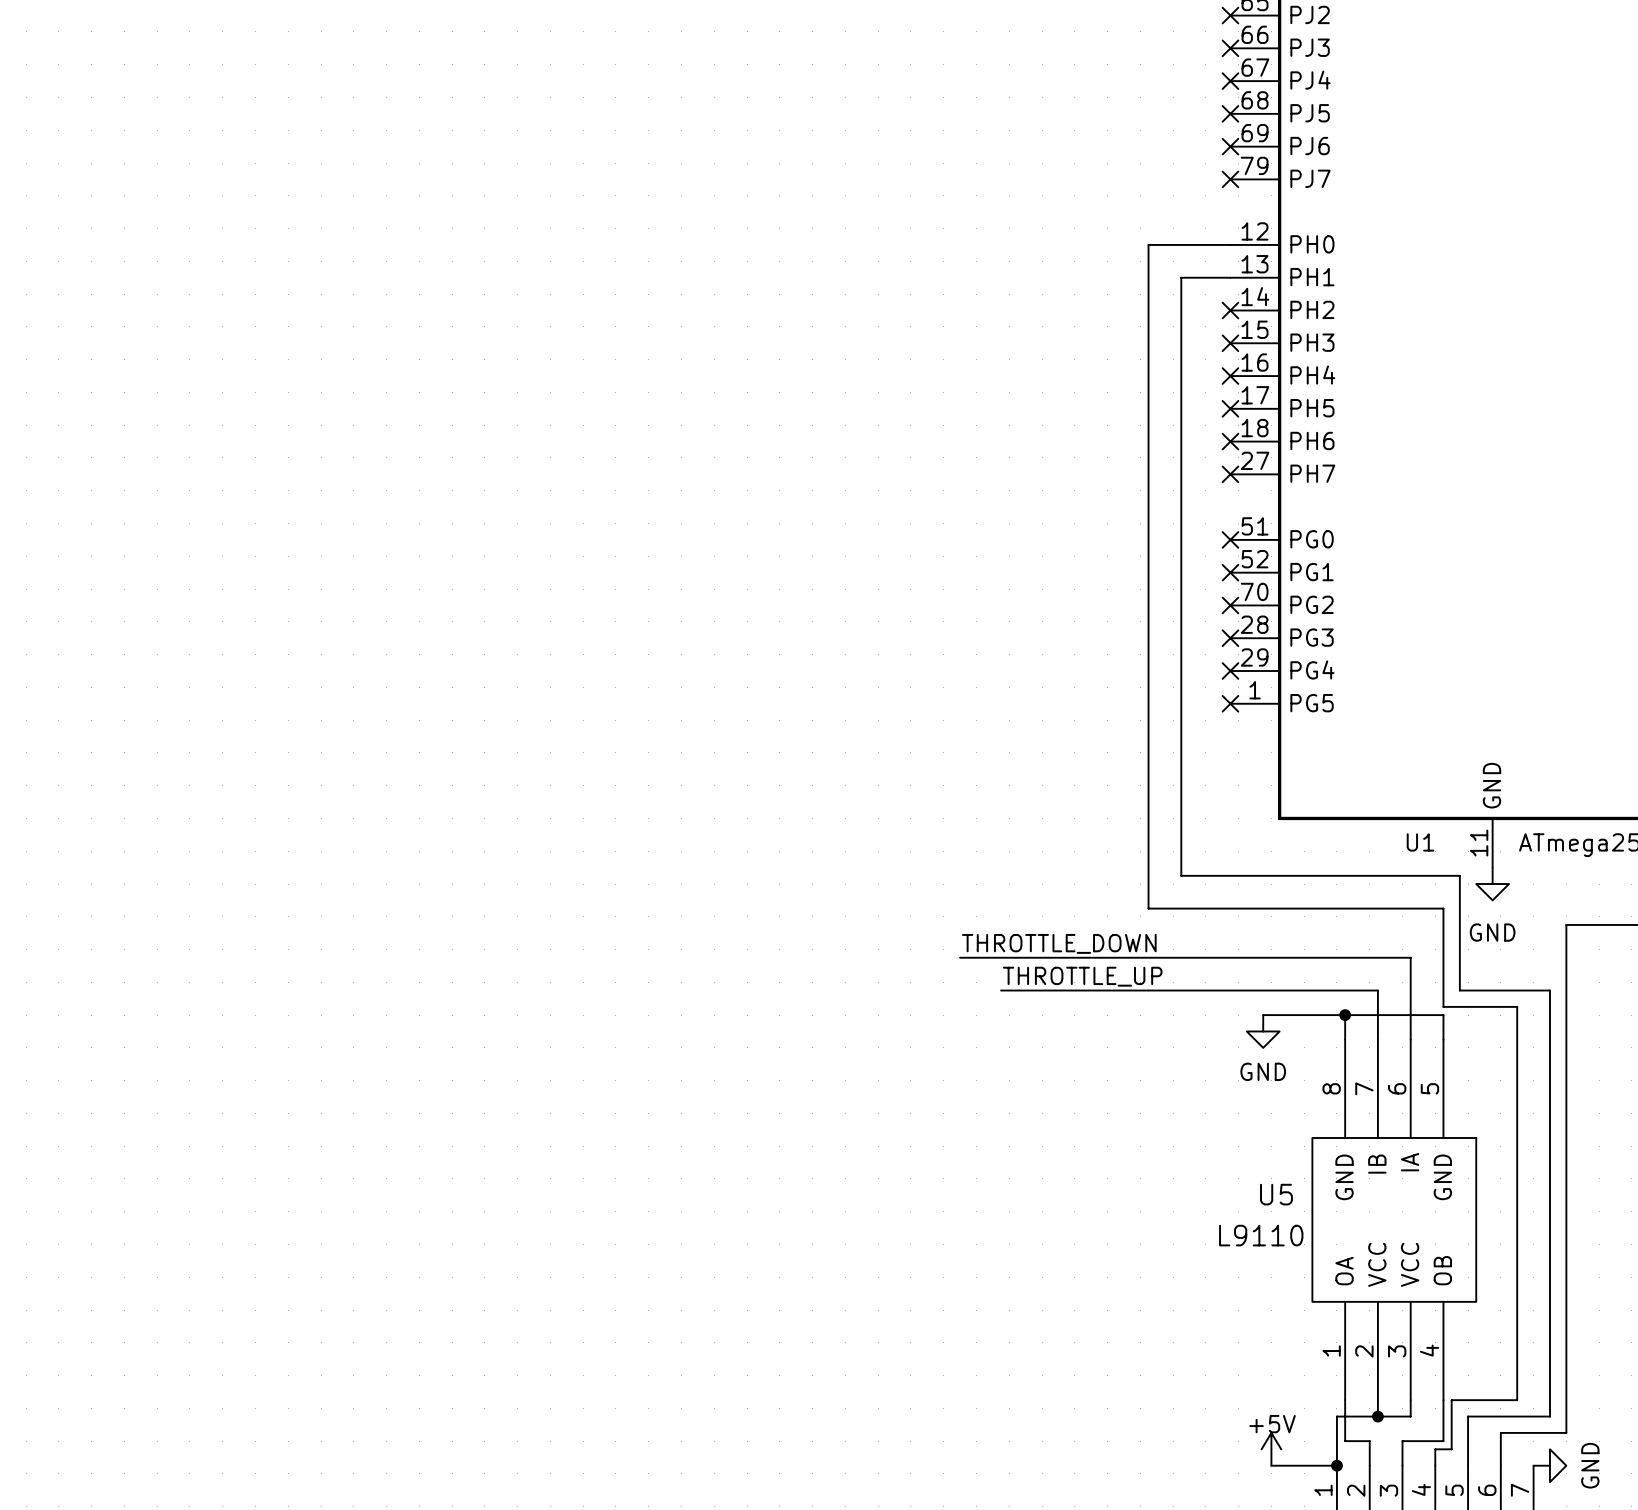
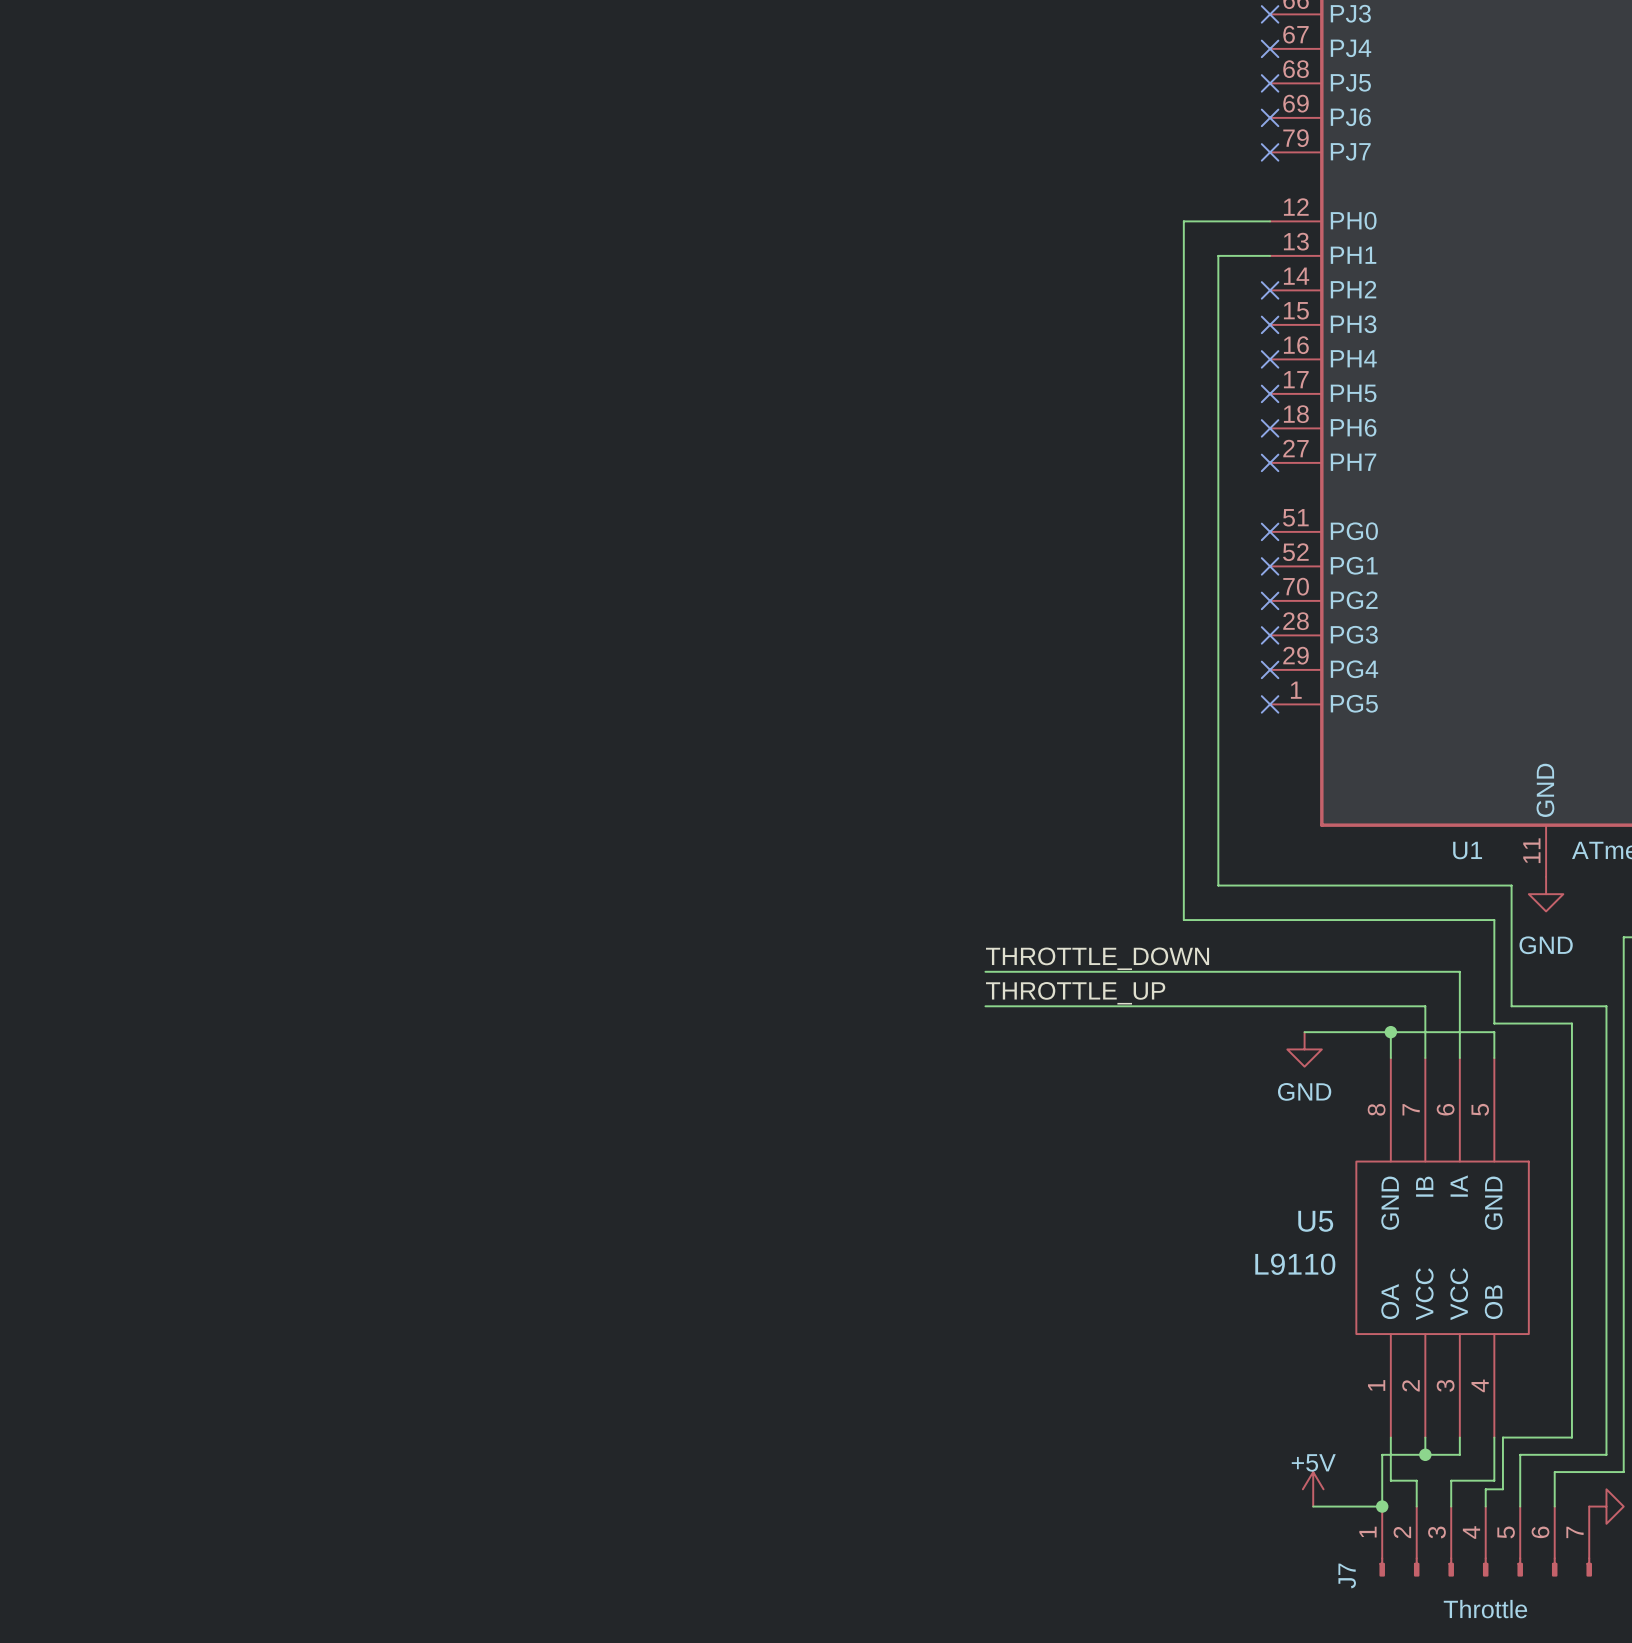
label position: THROTTLE_UP (1082, 976) -> THROTTLE_UP (1075, 993)
wire: none -> (985, 1006) (1028, 1006)

